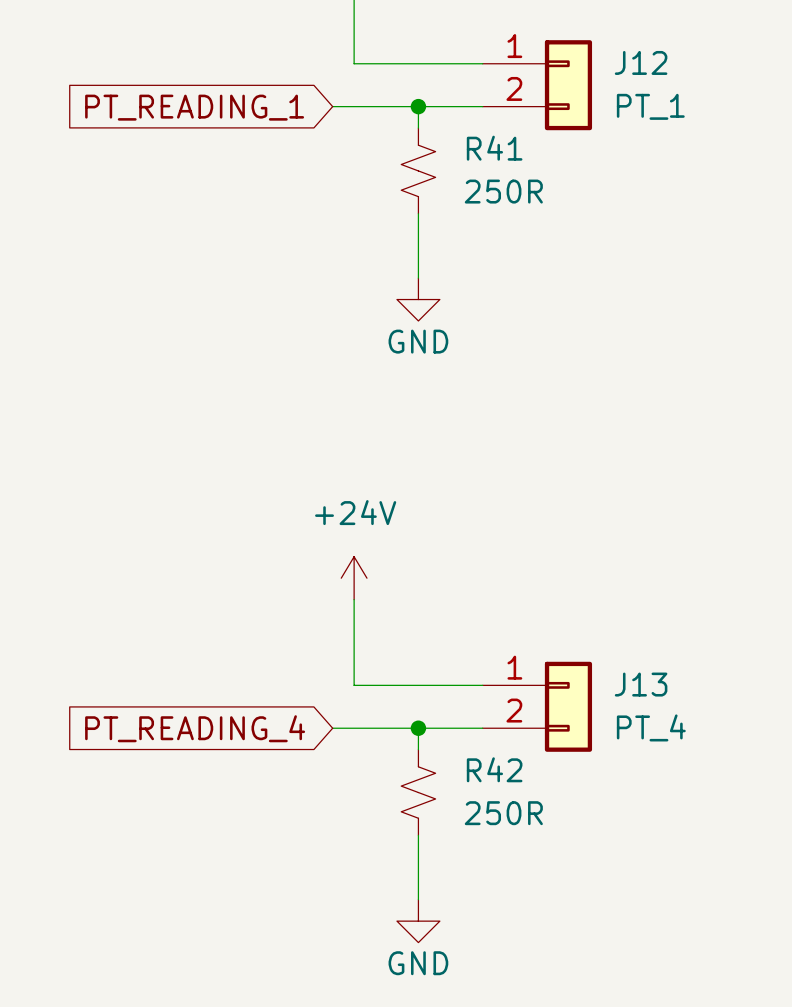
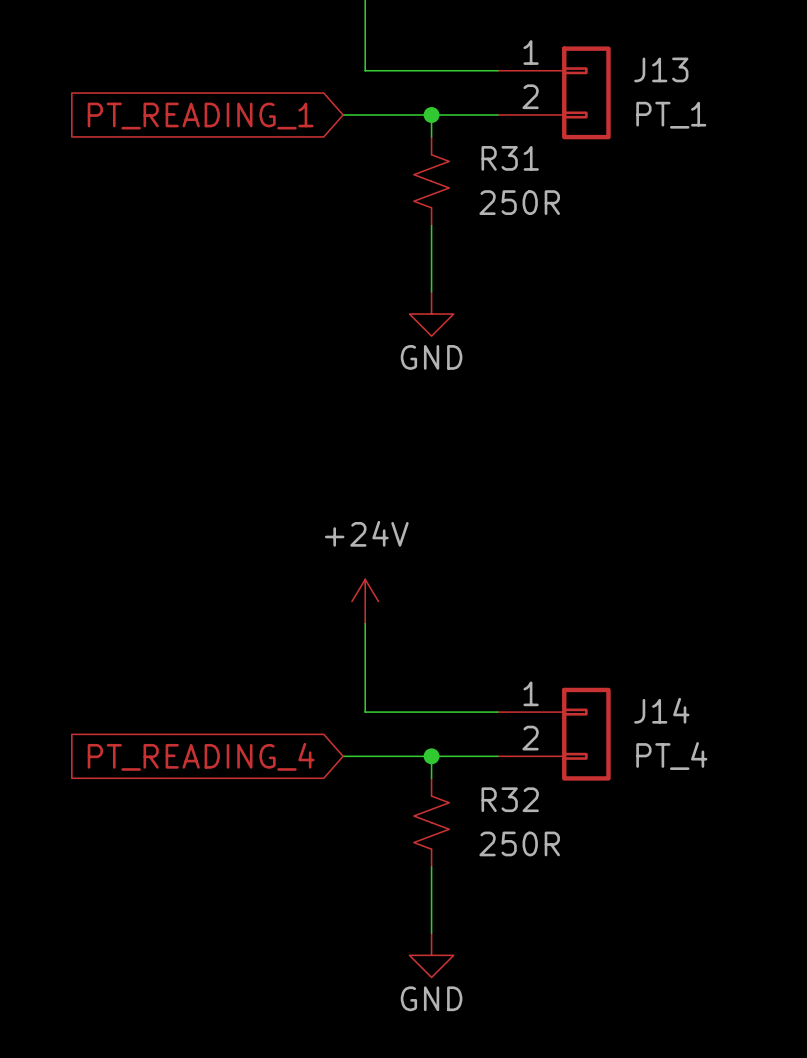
J12 name: J12 (641, 62) -> J13 (661, 69)
R41 name: R41 (494, 148) -> R31 (510, 158)
J13 name: J13 (641, 684) -> J14 (661, 710)
R42 name: R42 (494, 769) -> R32 (510, 799)

